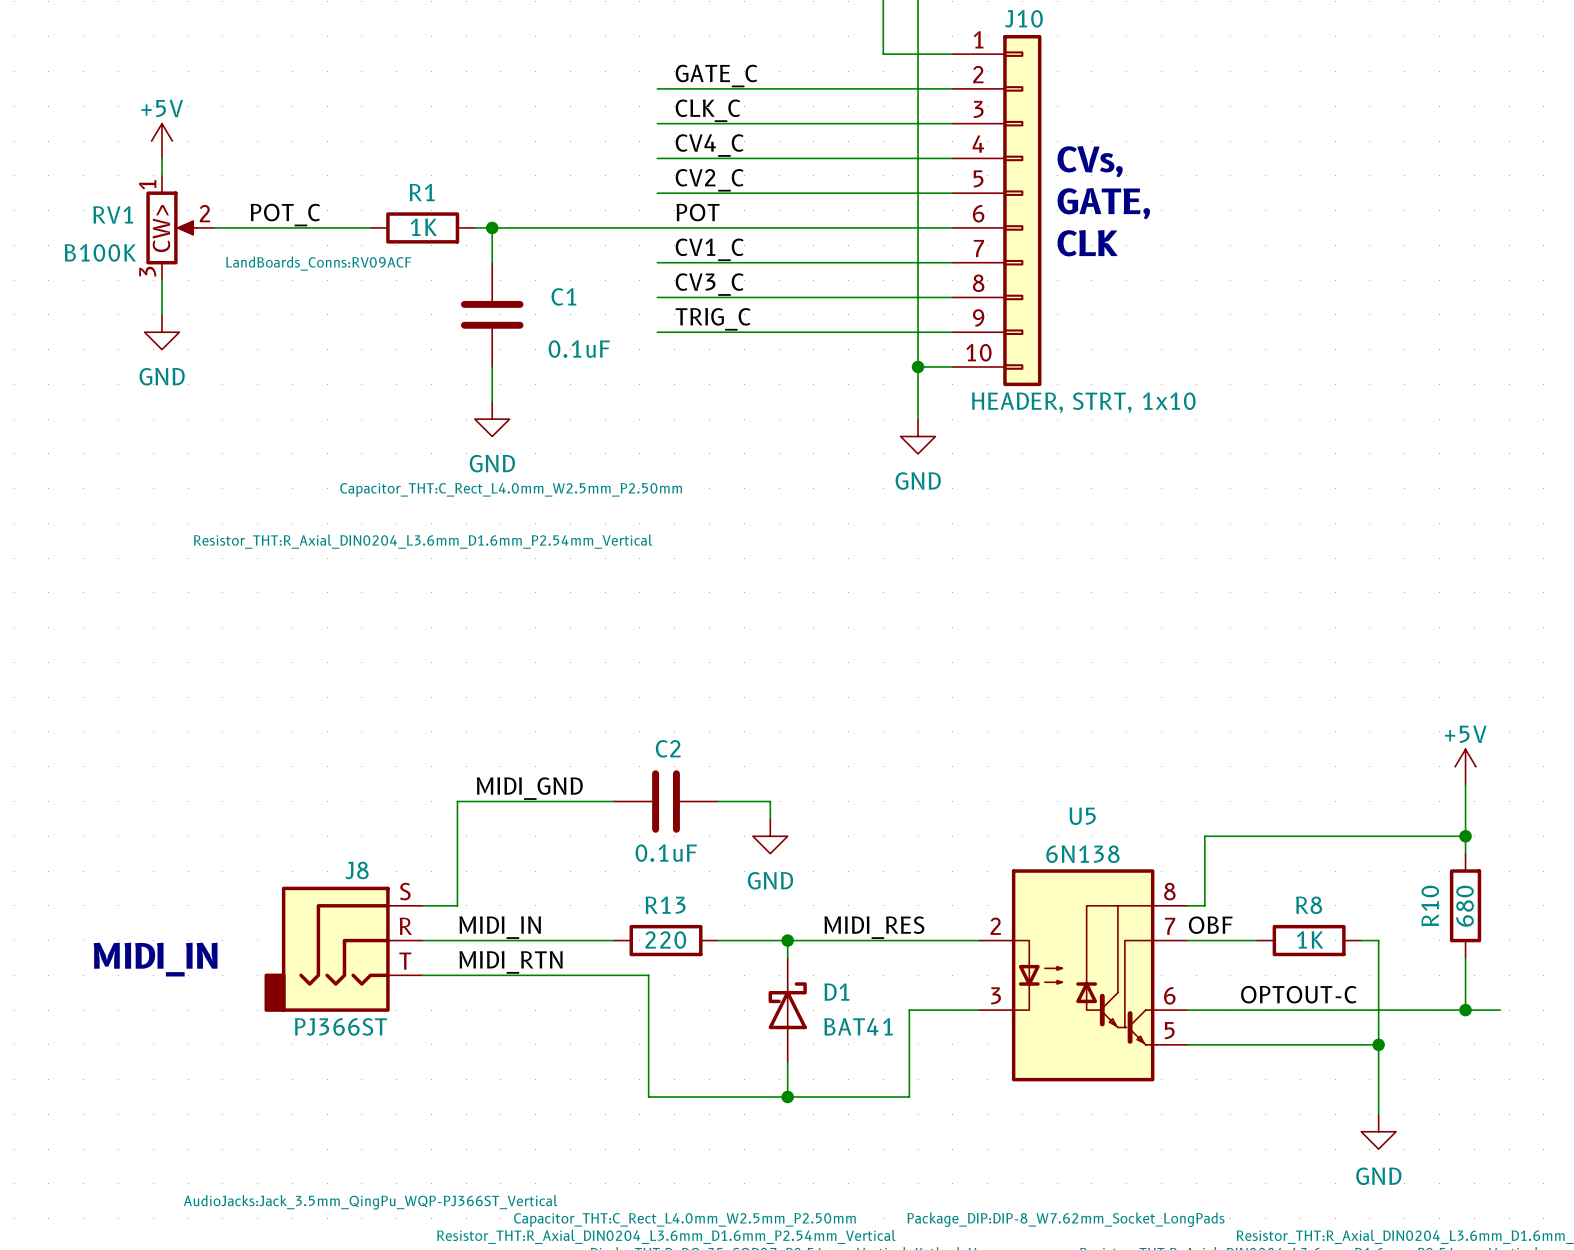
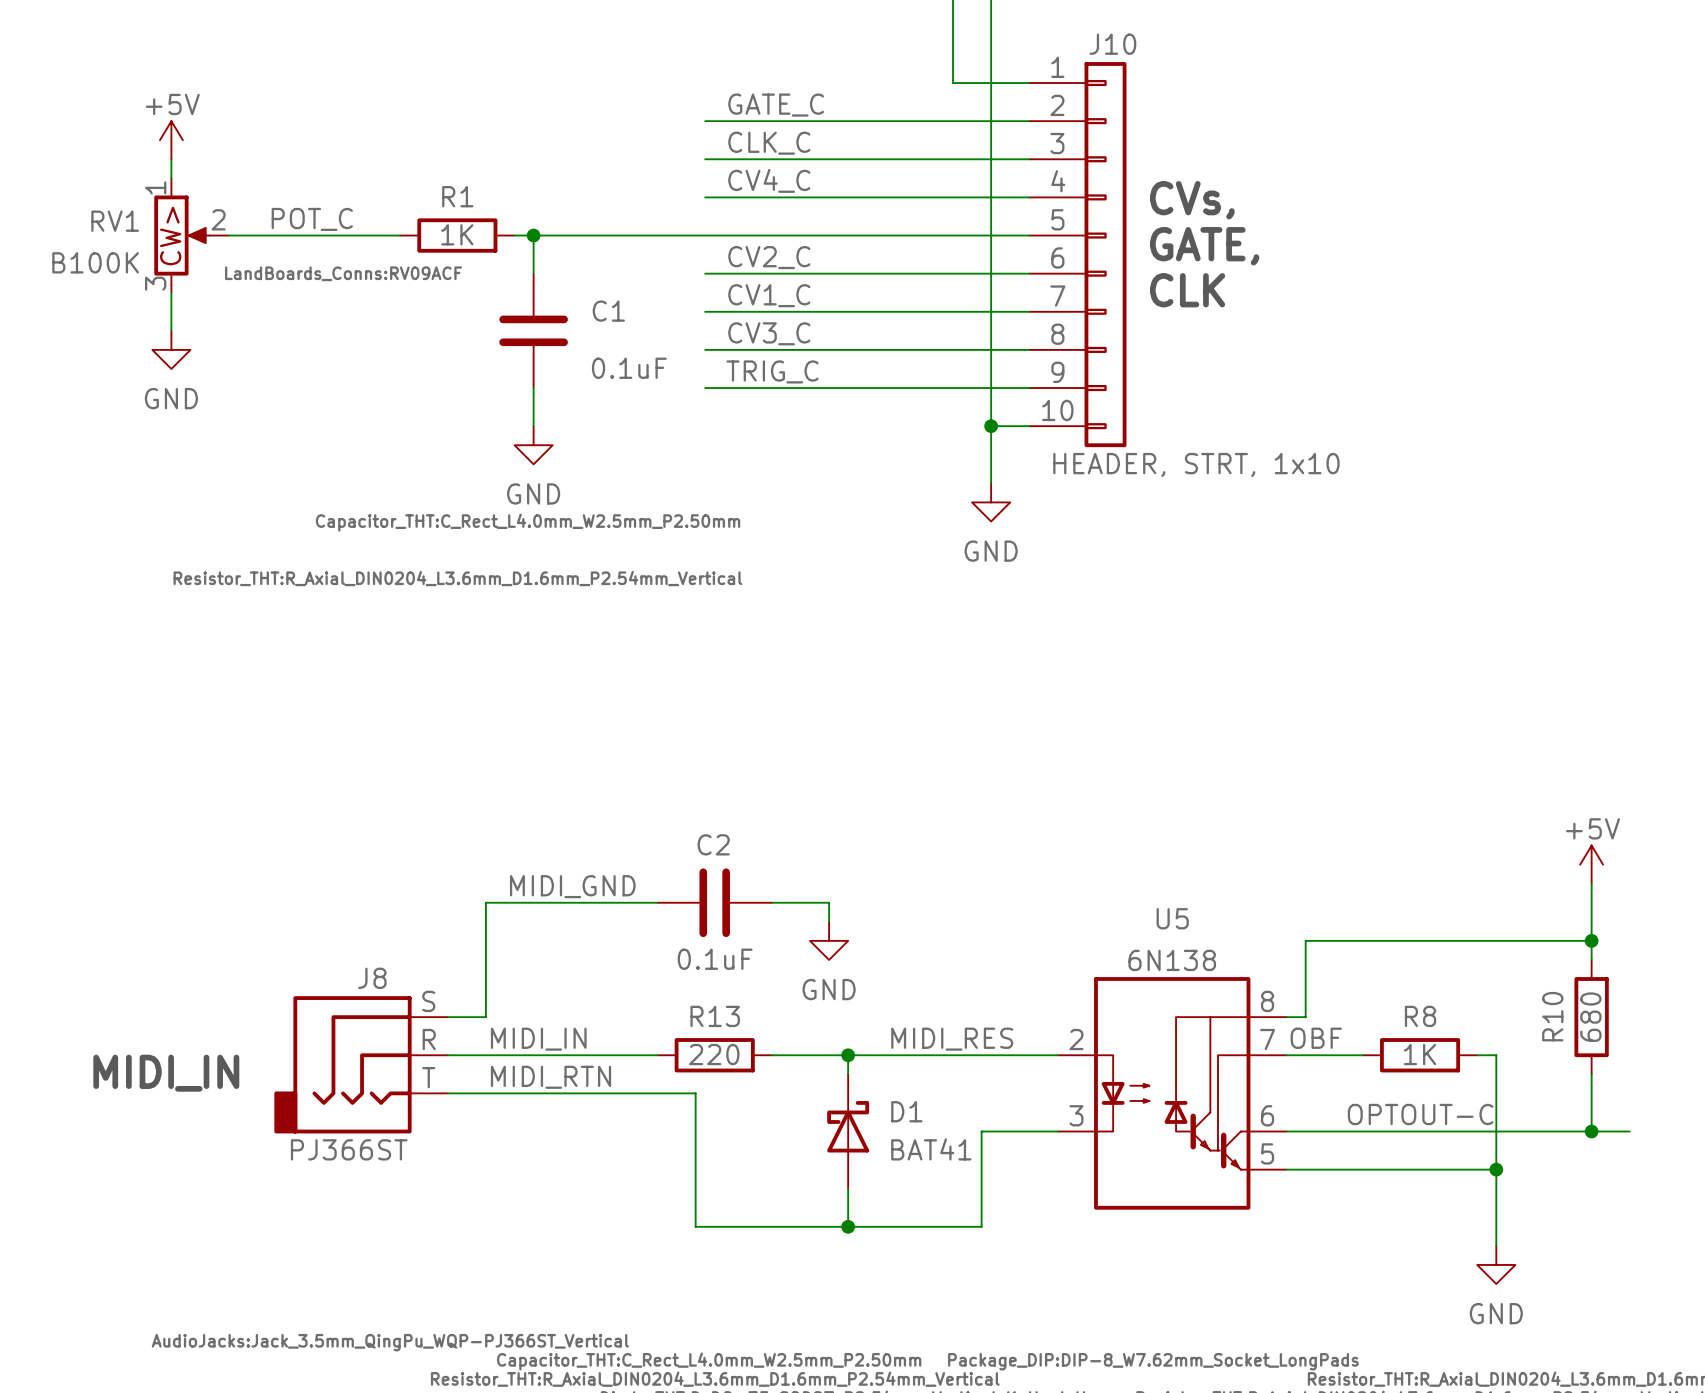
power symbol position: +5V (161, 141) -> +5V (171, 140)
wire: (161, 158) (161, 175) -> (171, 159) (171, 178)
label: CV2_C (709, 180) -> none
wire: none -> (514, 235) (705, 235)
label: POT (697, 212) -> CV2_C (769, 257)
label position: POT_C (285, 215) -> POT_C (312, 219)
RV1 position: (180, 227) -> (191, 235)
wire: (214, 227) (370, 227) -> (228, 235) (400, 235)
R1 position: (422, 227) -> (457, 235)
wire: (474, 227) (657, 227) -> none
wire: (492, 227) (492, 262) -> (533, 235) (533, 273)
junction position: (492, 227) -> (533, 235)
wire: (161, 280) (161, 314) -> (171, 292) (171, 330)
C1 position: (492, 314) -> (533, 330)
power symbol position: GND (161, 332) -> GND (171, 349)
wire: (492, 366) (492, 401) -> (533, 388) (533, 426)
power symbol position: GND (492, 419) -> GND (533, 445)

